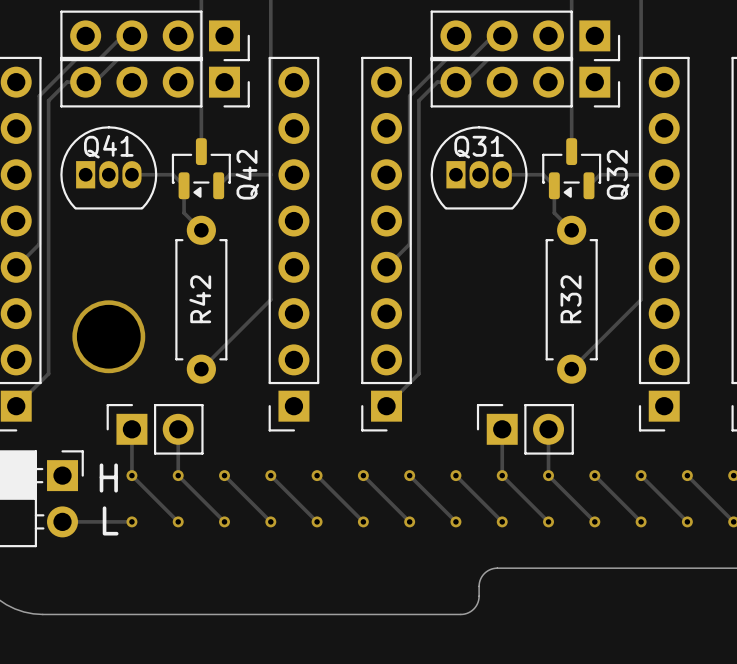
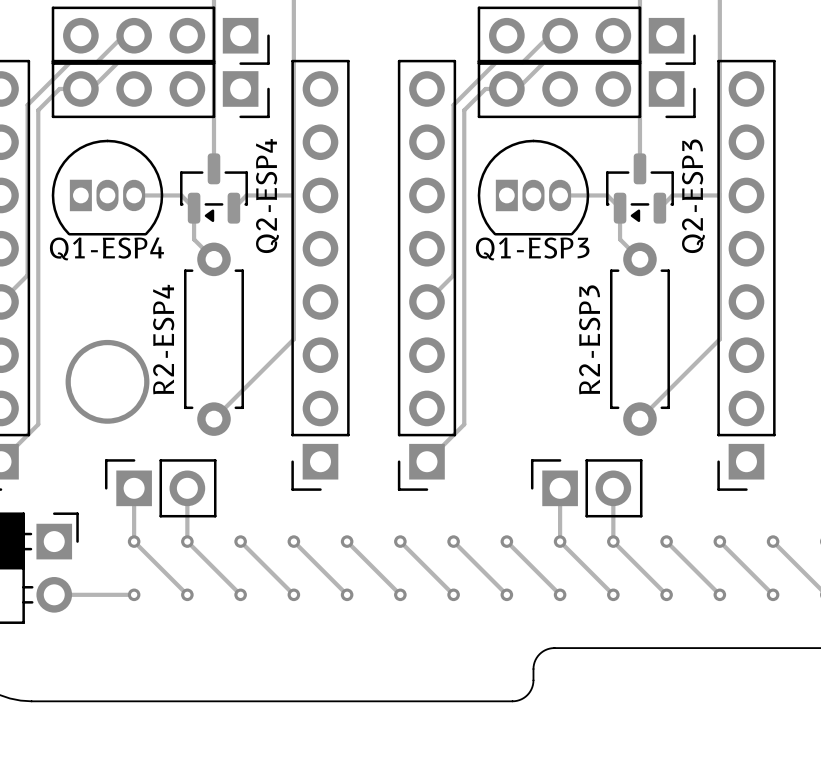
Q41 name: Q41 (108, 146) -> Q1-ESP4 (106, 248)
Q31 name: Q31 (479, 147) -> Q1-ESP3 (532, 248)
Q42 name: Q42 (247, 174) -> Q2-ESP4 (267, 195)
Q32 name: Q32 (618, 174) -> Q2-ESP3 (693, 196)
R42 name: R42 (200, 299) -> R2-ESP4 (163, 339)
R32 name: R32 (570, 299) -> R2-ESP3 (589, 339)
text: H (108, 478) -> none
text: L (110, 520) -> none

